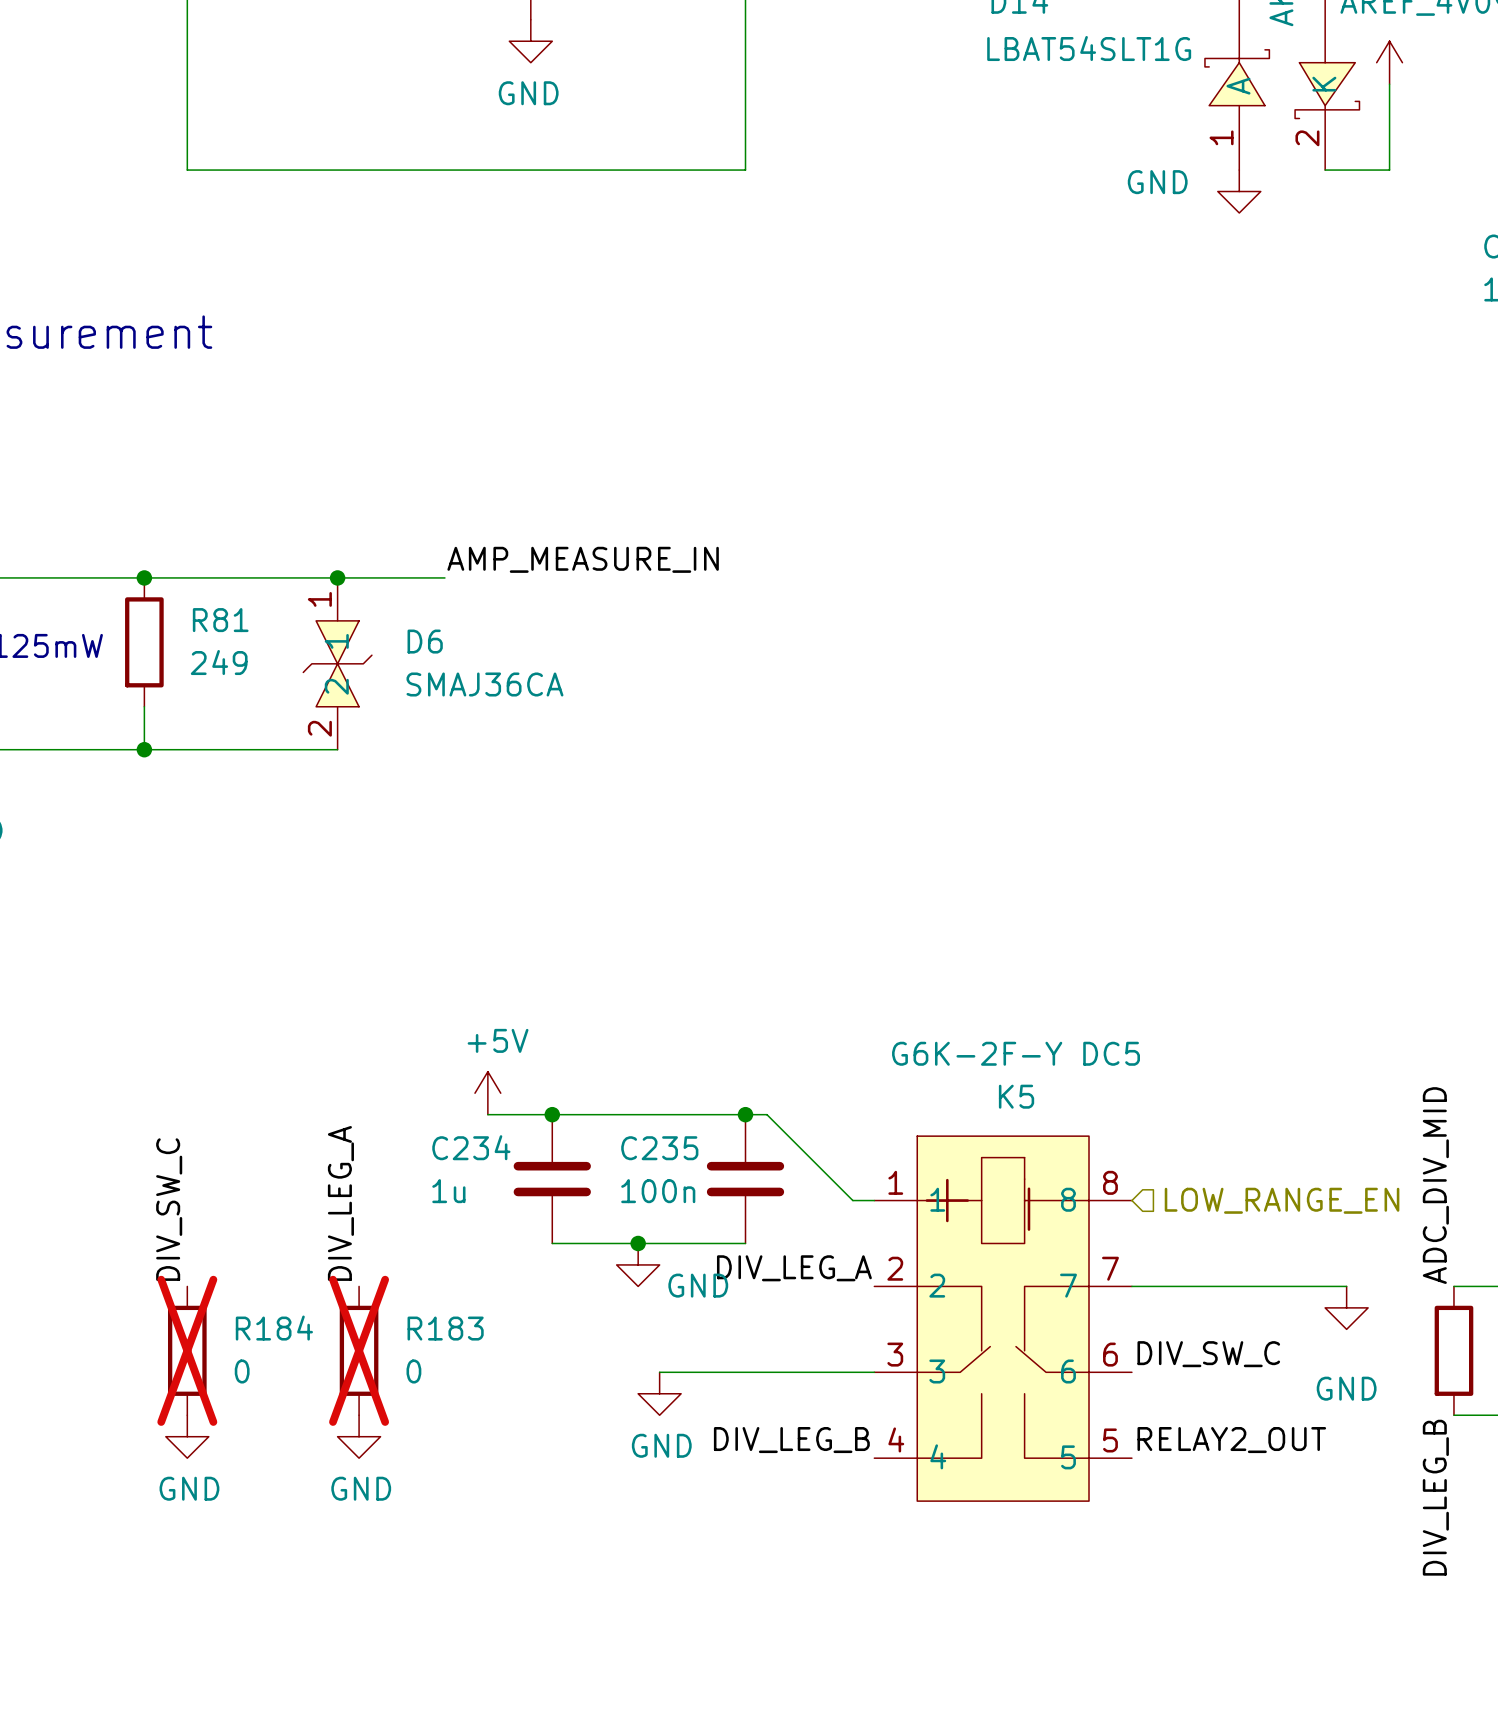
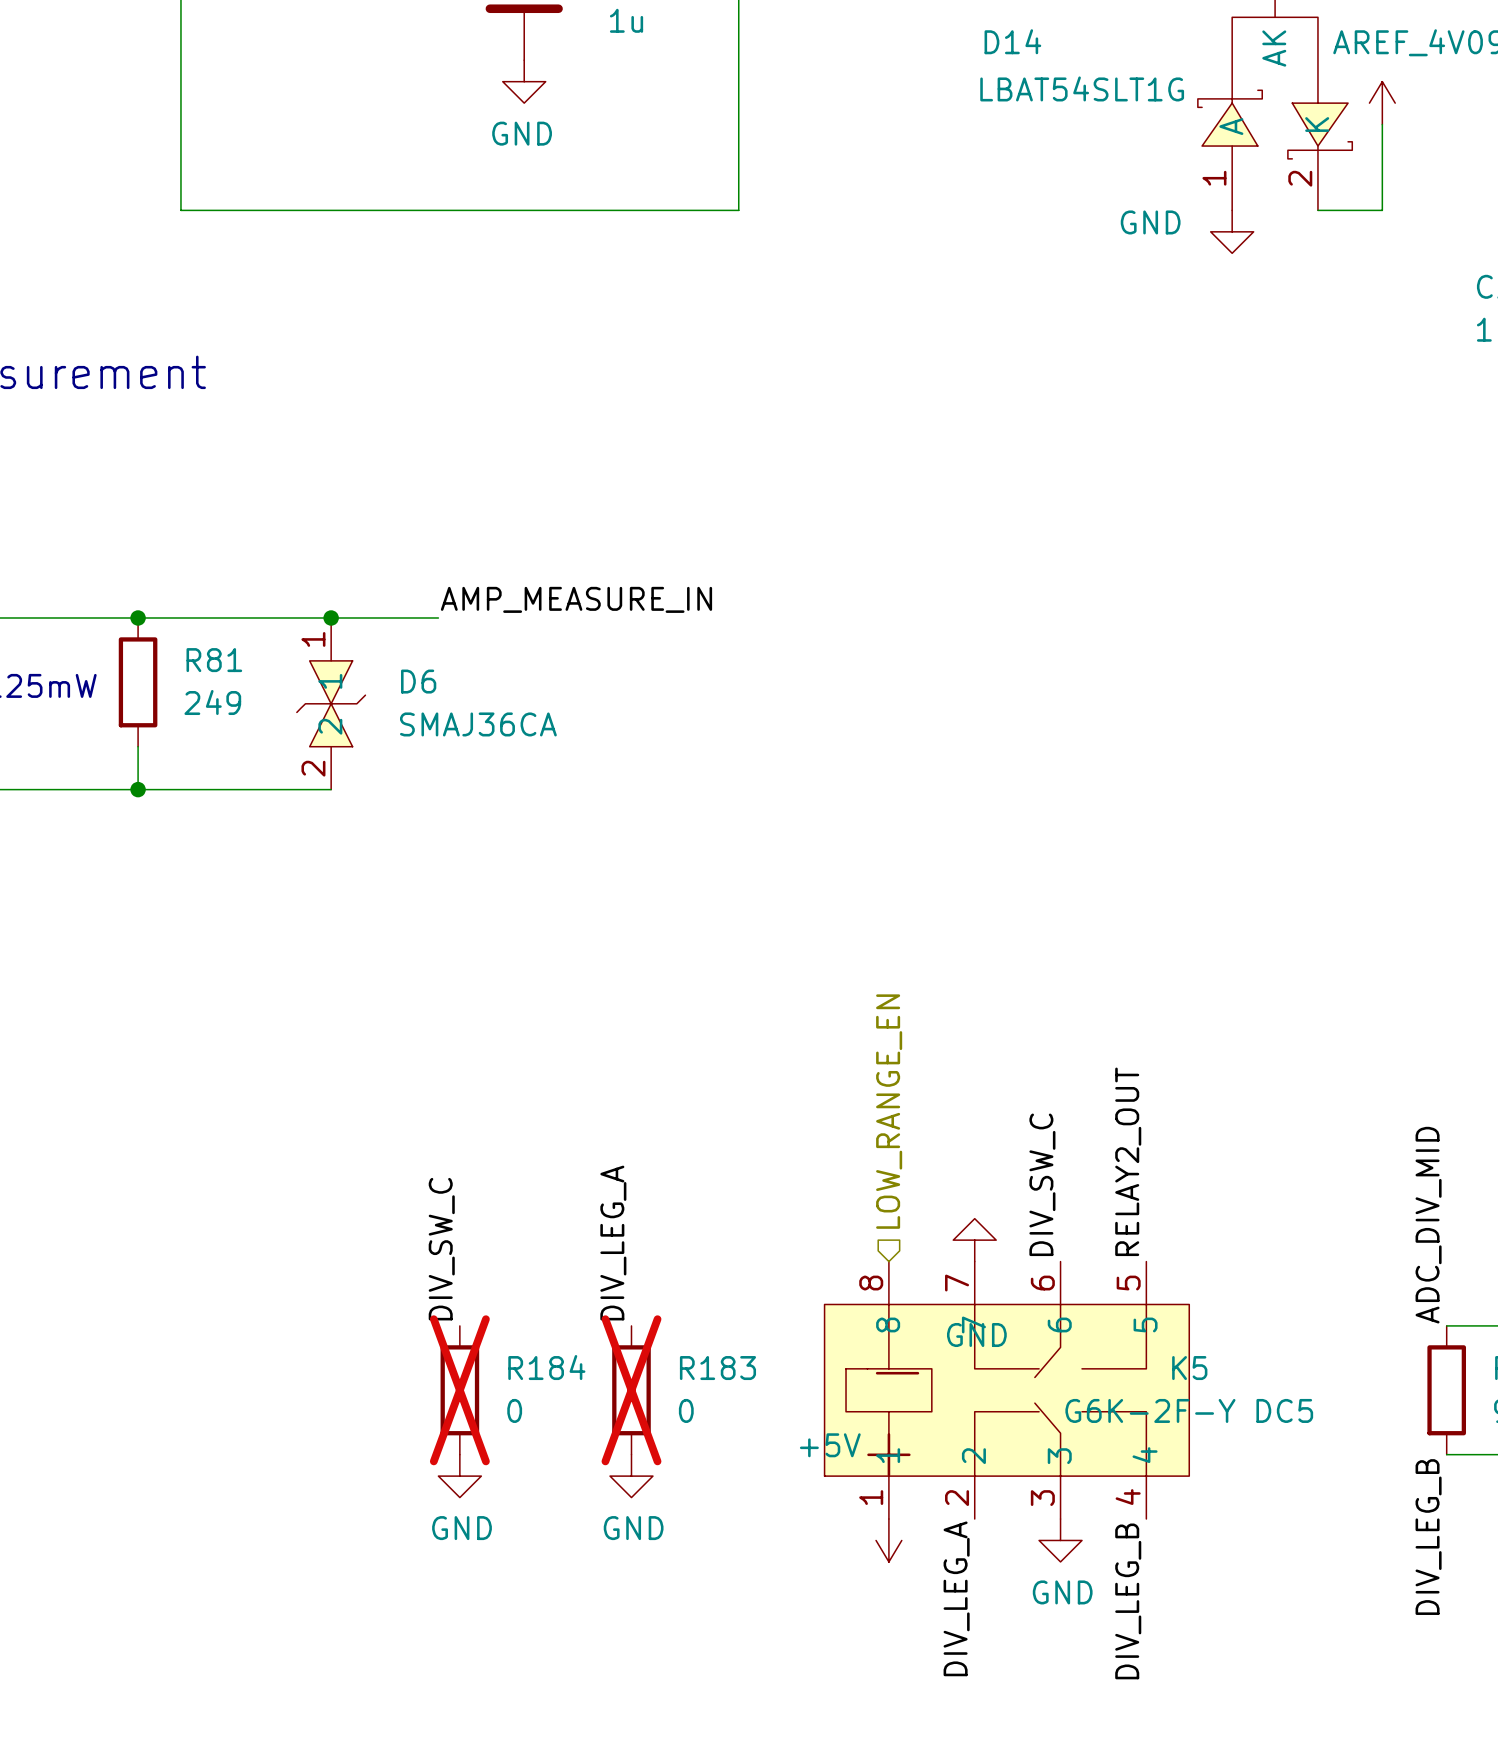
K5 value position: G6K-2F-Y DC5 (1016, 1053) -> G6K-2F-Y DC5 (1189, 1410)
power symbol: +5V (487, 1093) -> none
K5 name position: K5 (1016, 1096) -> K5 (1189, 1368)
wire: (487, 1114) (766, 1114) (852, 1200) (874, 1200) -> none
junction: (552, 1114) -> none
junction: (745, 1114) -> none
C234: 1u (552, 1179) -> none
C235: 100n (745, 1179) -> none
power symbol: none -> GND (974, 1240)
hierarchical label rotation: 0° (1282, 1200) -> 90° counterclockwise (889, 1111)
hierarchical label position: LOW_RANGE_EN (1282, 1200) -> LOW_RANGE_EN (889, 1111)
label: DIV_LEG_A (340, 1203) -> none
label: none -> DIV_LEG_A (613, 1243)
label position: DIV_SW_C (169, 1209) -> DIV_SW_C (441, 1249)
wire: (552, 1243) (745, 1243) -> none
junction: (638, 1243) -> none
power symbol: GND (638, 1264) -> none
label: DIV_LEG_A (794, 1268) -> none
wire: (1131, 1286) (1346, 1286) -> none
power symbol: GND (1346, 1307) -> none
K5 rotation: 0° (1003, 1318) -> 90° counterclockwise (1006, 1390)
R184 position: (187, 1350) -> (459, 1390)
R183 position: (359, 1350) -> (631, 1390)
label rotation: 0° (1208, 1354) -> 90° counterclockwise (1042, 1184)
label position: DIV_SW_C (1208, 1354) -> DIV_SW_C (1042, 1184)
wire: (659, 1372) (874, 1372) -> none
power symbol position: GND (659, 1393) -> GND (631, 1476)
power symbol: GND (187, 1436) -> none
power symbol: GND (359, 1436) -> none
power symbol: none -> GND (459, 1476)
label rotation: 0° (791, 1440) -> 90° counterclockwise (1128, 1601)
label position: DIV_LEG_B (791, 1440) -> DIV_LEG_B (1128, 1601)
label rotation: 0° (1231, 1440) -> 90° counterclockwise (1128, 1161)
label position: RELAY2_OUT (1231, 1440) -> RELAY2_OUT (1128, 1161)
power symbol: none -> +5V (888, 1540)
power symbol: none -> GND (1060, 1540)
label: none -> DIV_LEG_A (956, 1598)

